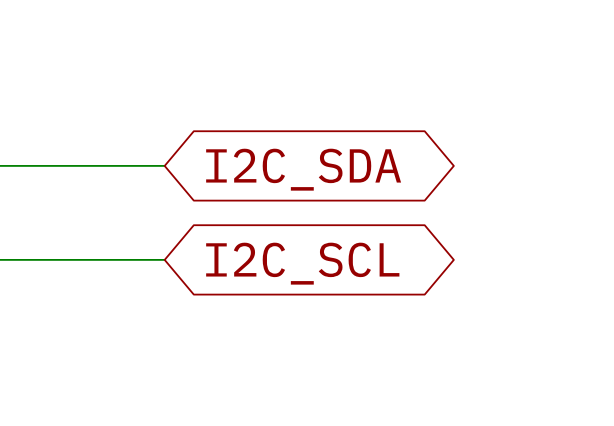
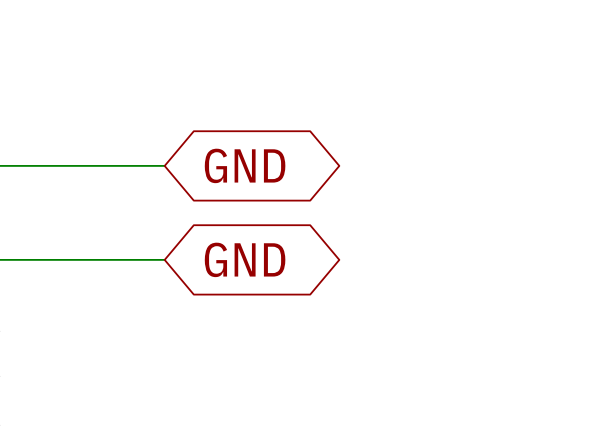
global label: I2C_SDA (303, 169) -> GND (245, 165)
global label: I2C_SCL (302, 263) -> GND (245, 259)

